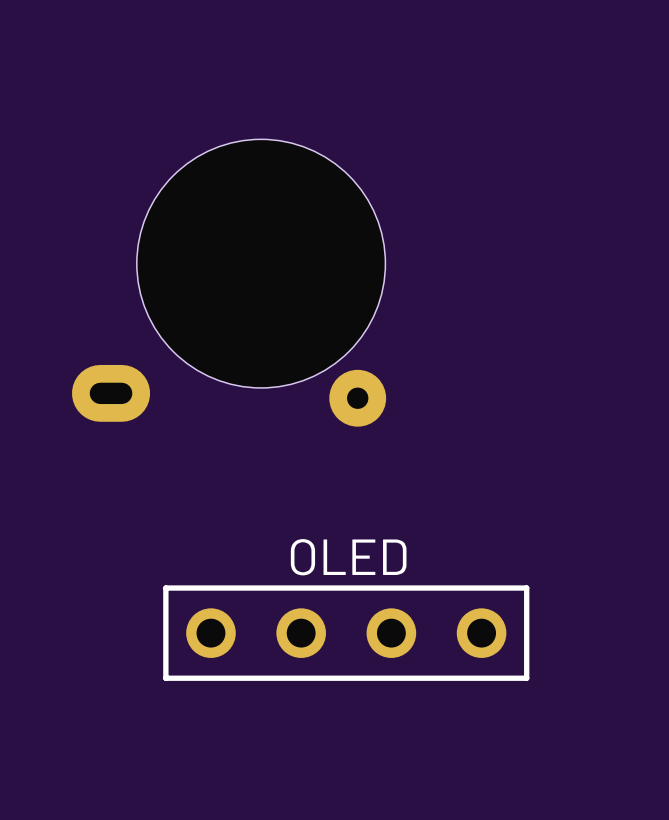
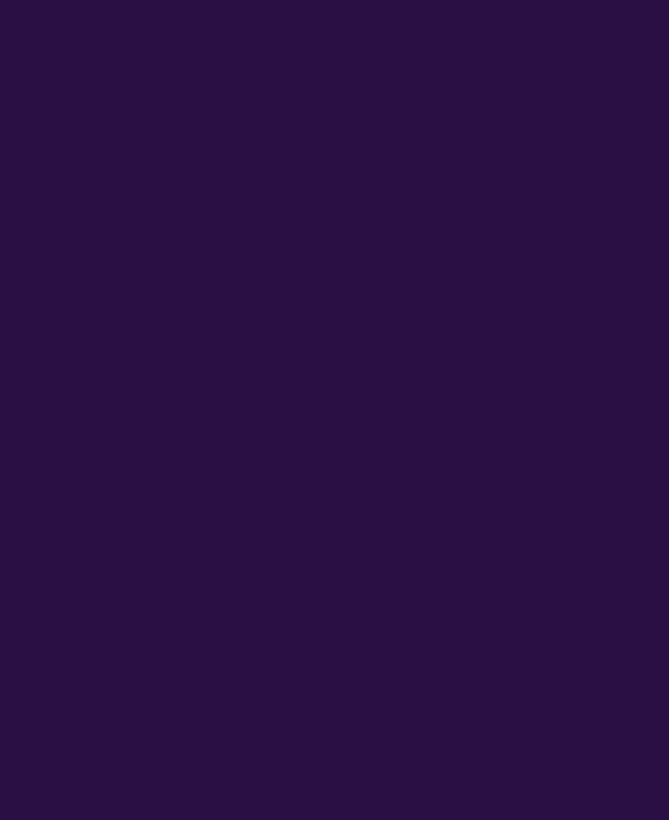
part: (229, 283) -> none
part: (346, 633) -> none

